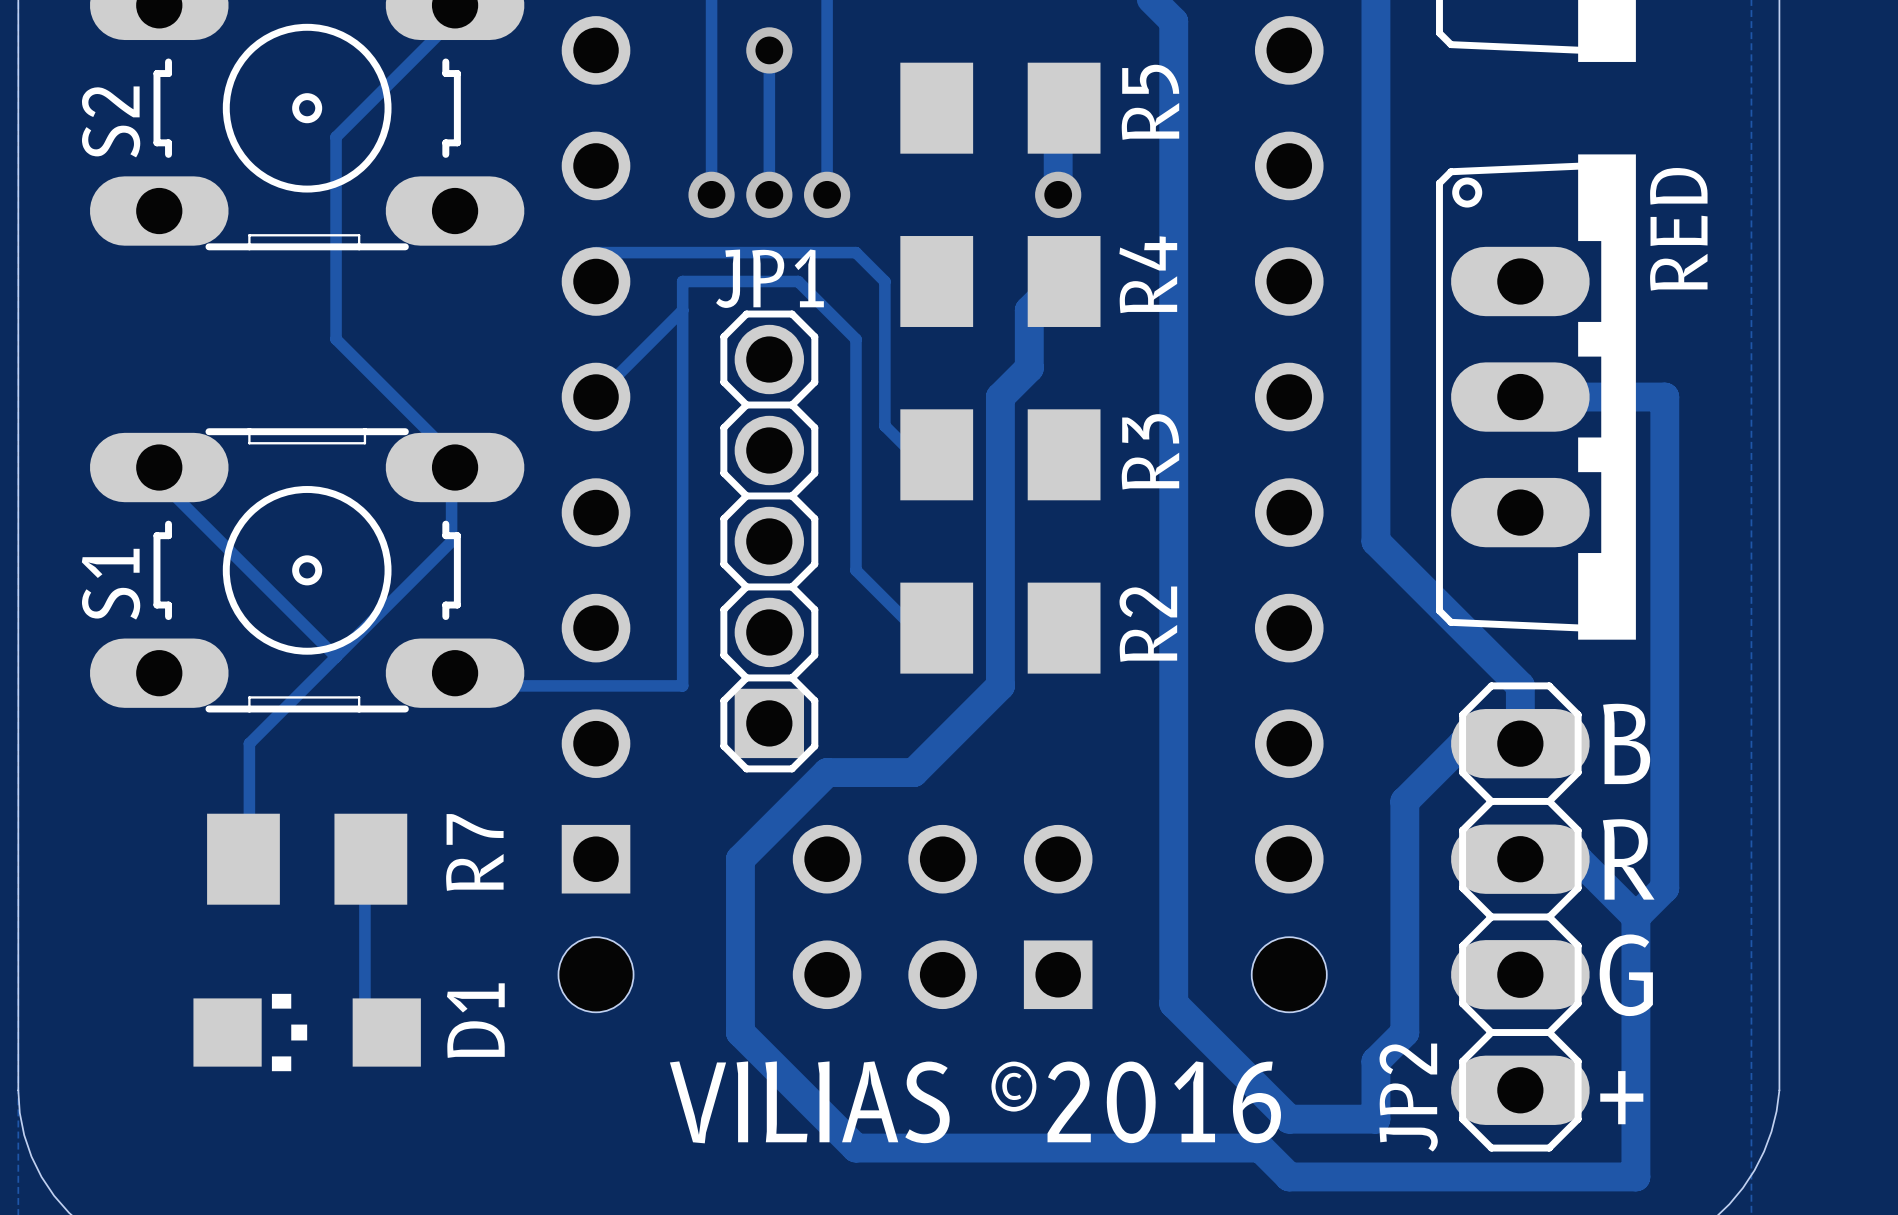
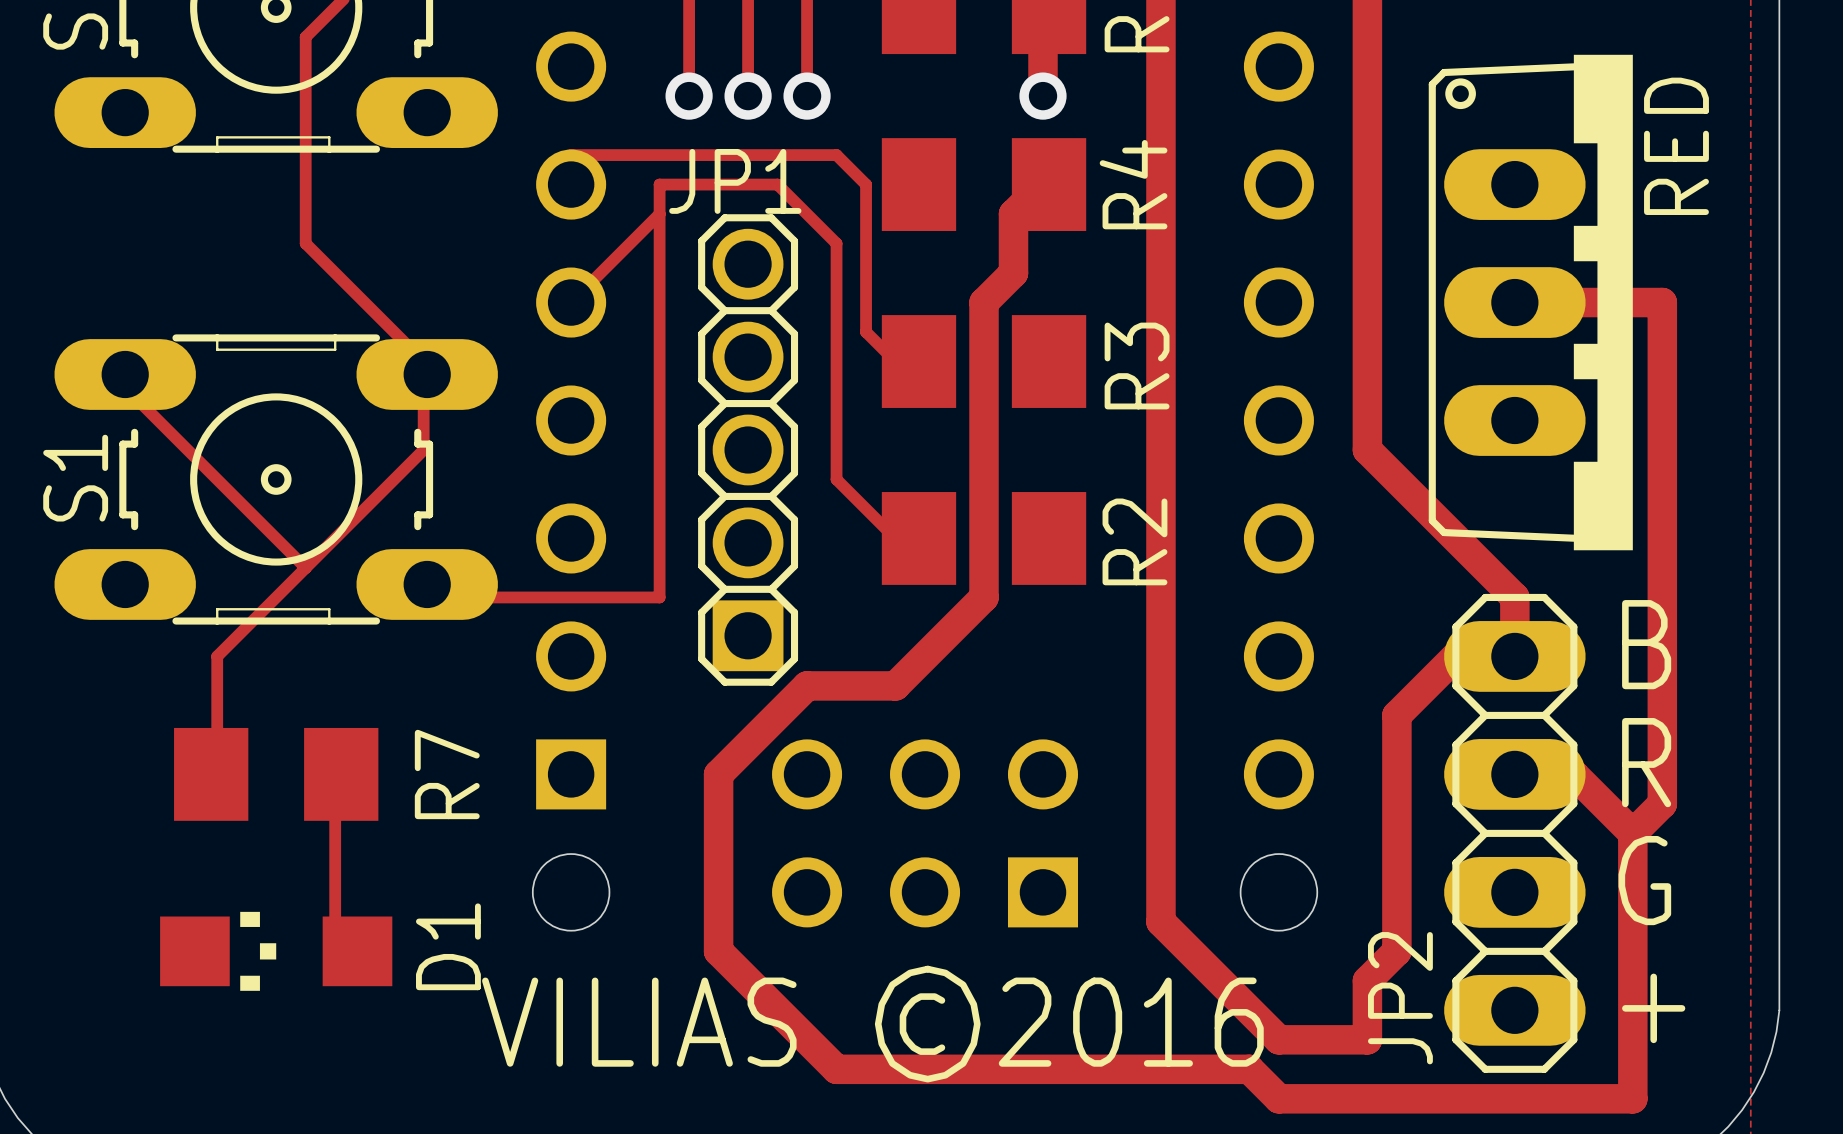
text position: B (1626, 743) -> B (1646, 644)
text position: R (1628, 859) -> R (1646, 762)
text position: G (1626, 975) -> G (1644, 880)
text position: + (1621, 1097) -> + (1653, 1008)

